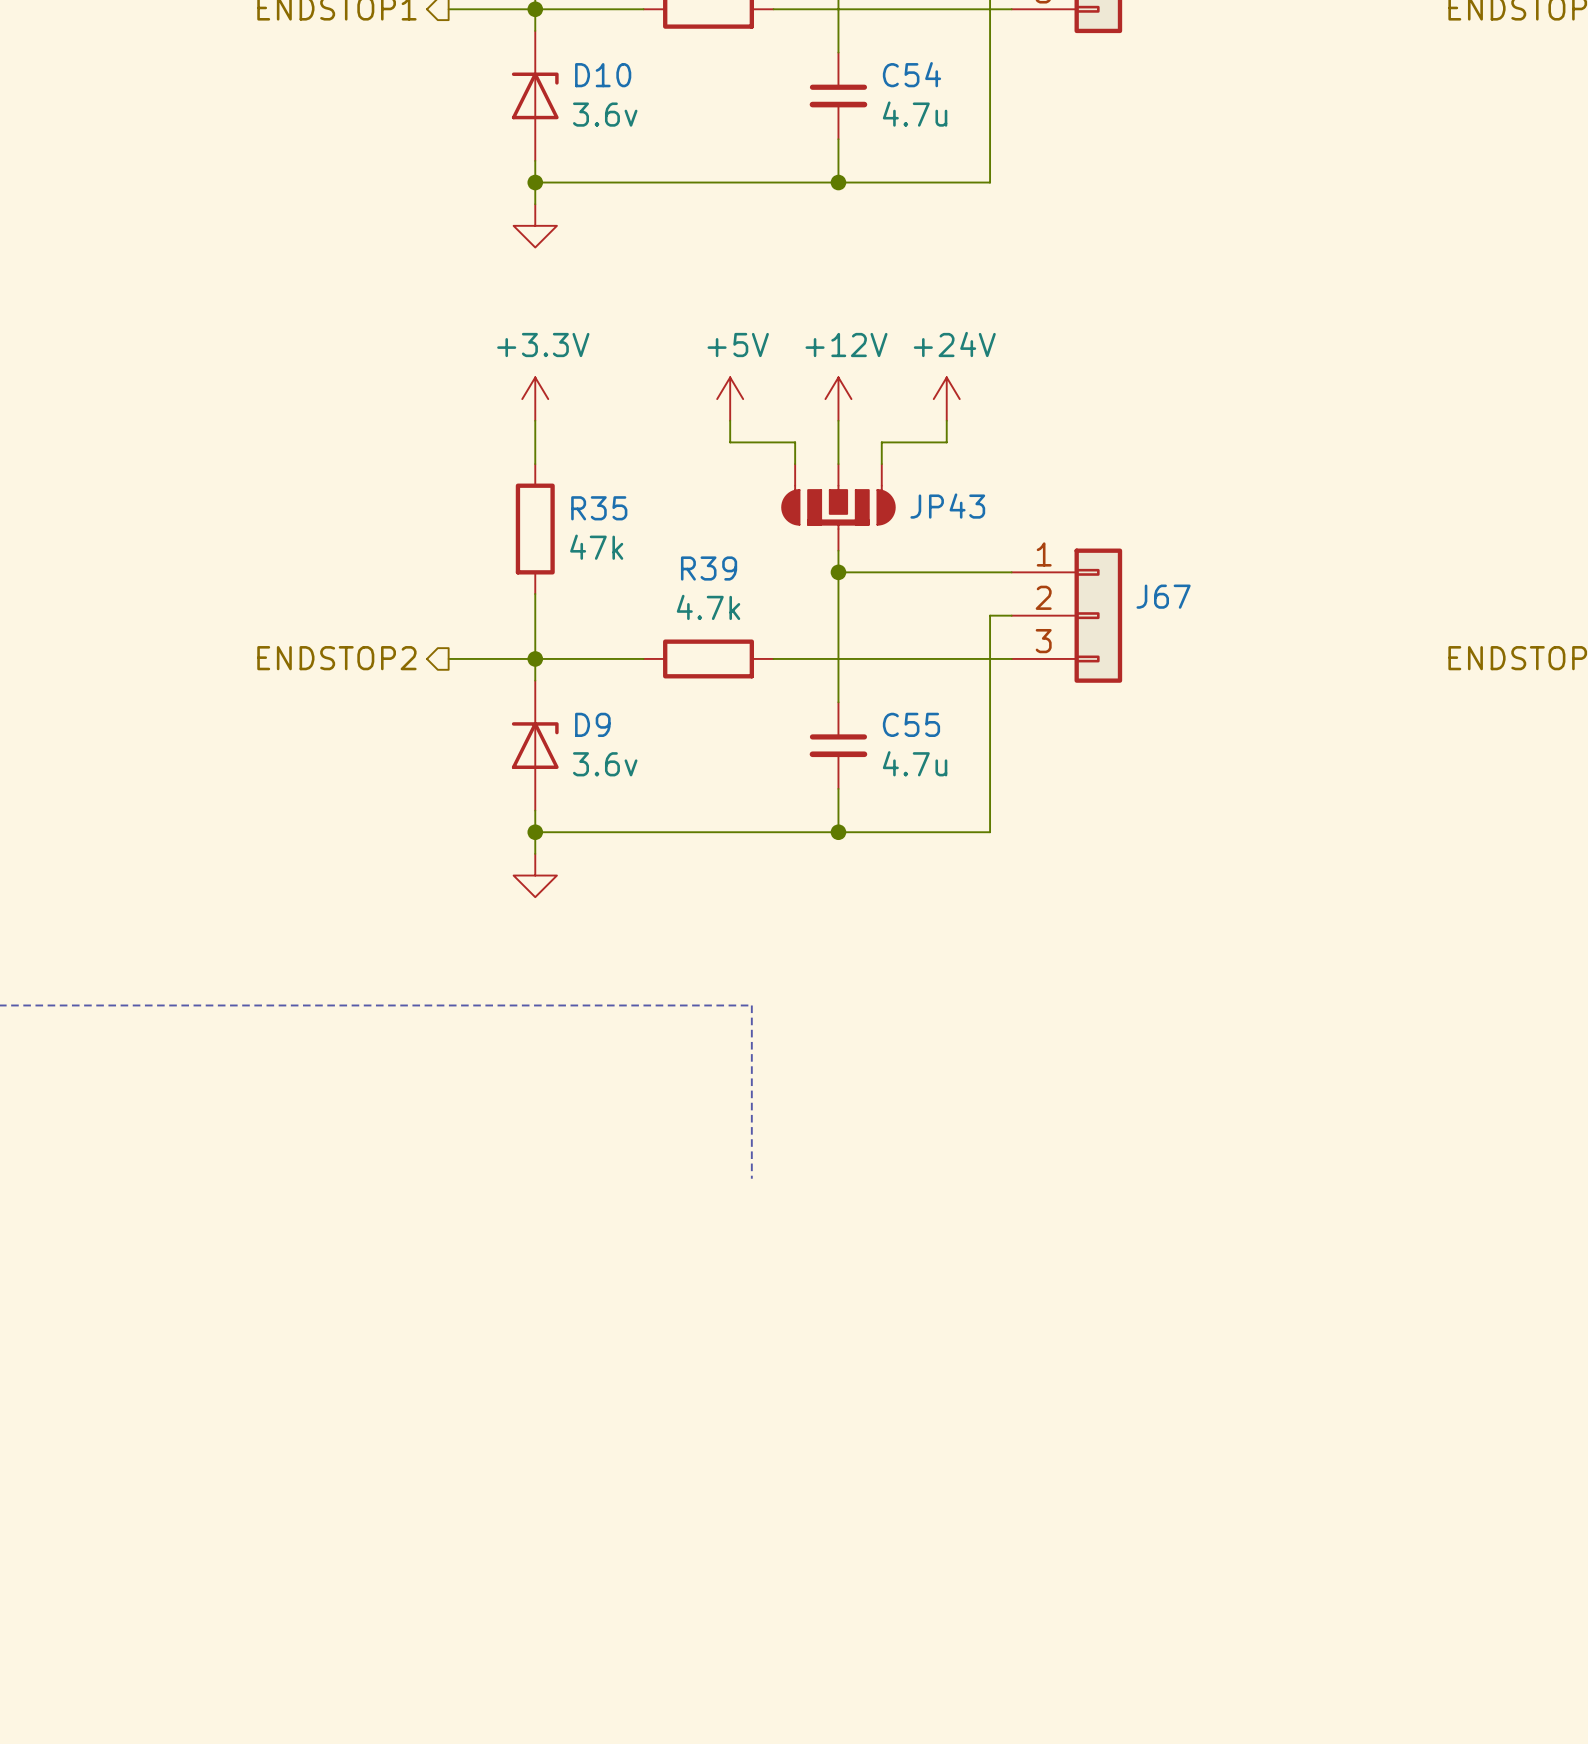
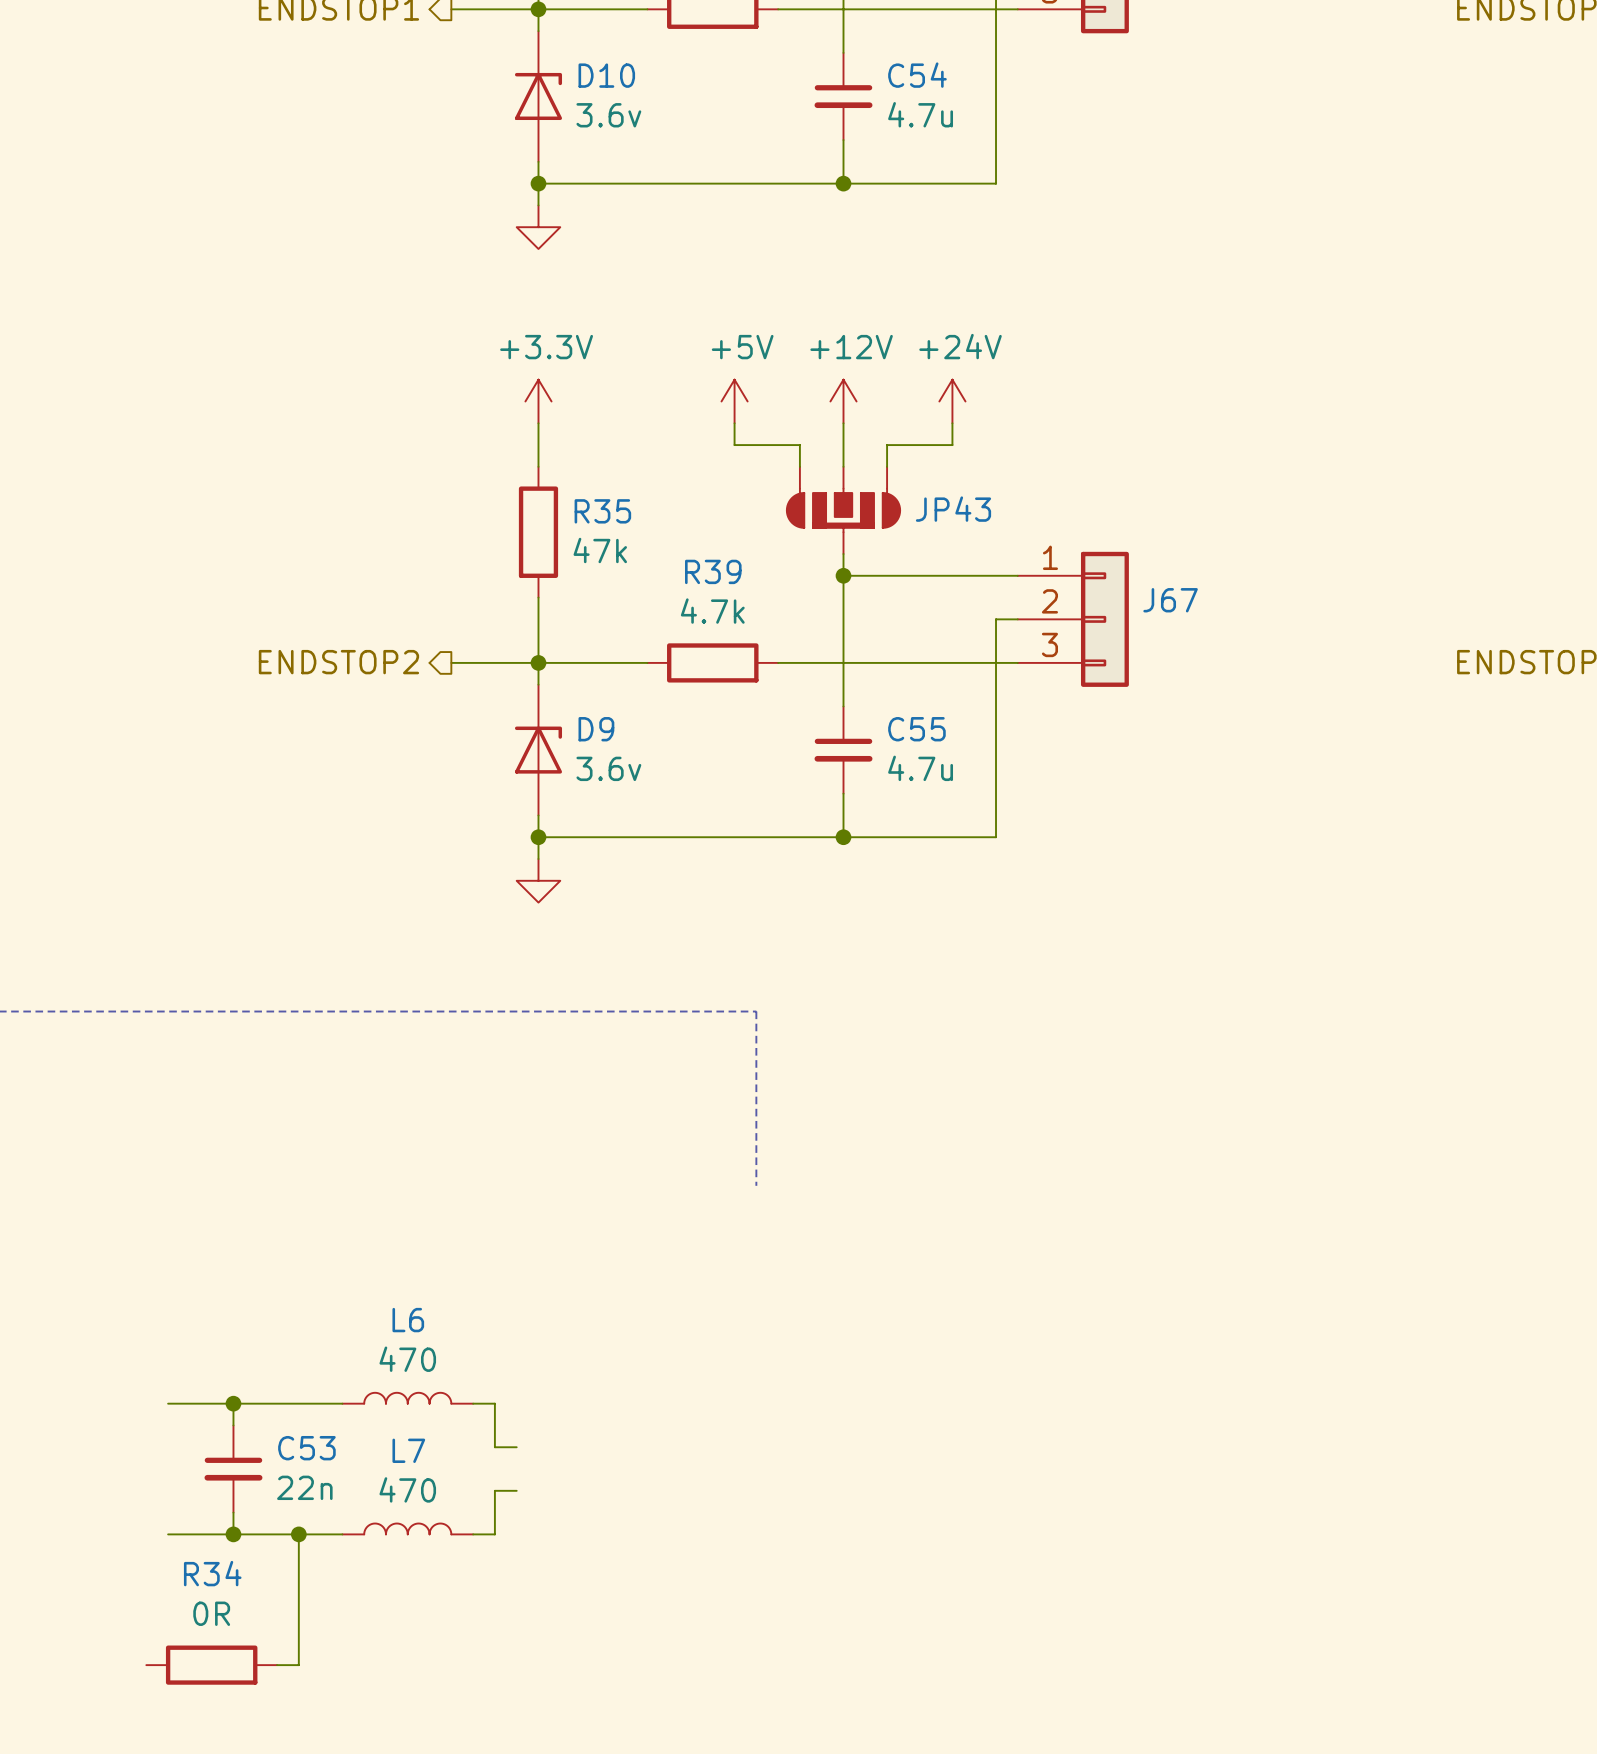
L6: none -> 470 (407, 1398)
wire: none -> (168, 1403) (342, 1403)
wire: none -> (233, 1403) (233, 1425)
junction: none -> (233, 1403)
wire: none -> (473, 1403) (494, 1403) (494, 1447) (516, 1447)
C53: none -> 22n (233, 1469)
wire: none -> (516, 1490) (494, 1490) (494, 1534) (473, 1534)
wire: none -> (233, 1512) (233, 1534)
L7: none -> 470 (407, 1528)
wire: none -> (168, 1534) (342, 1534)
junction: none -> (233, 1534)
wire: none -> (298, 1534) (298, 1665) (277, 1665)
junction: none -> (298, 1534)
R34: none -> 0R (211, 1665)

